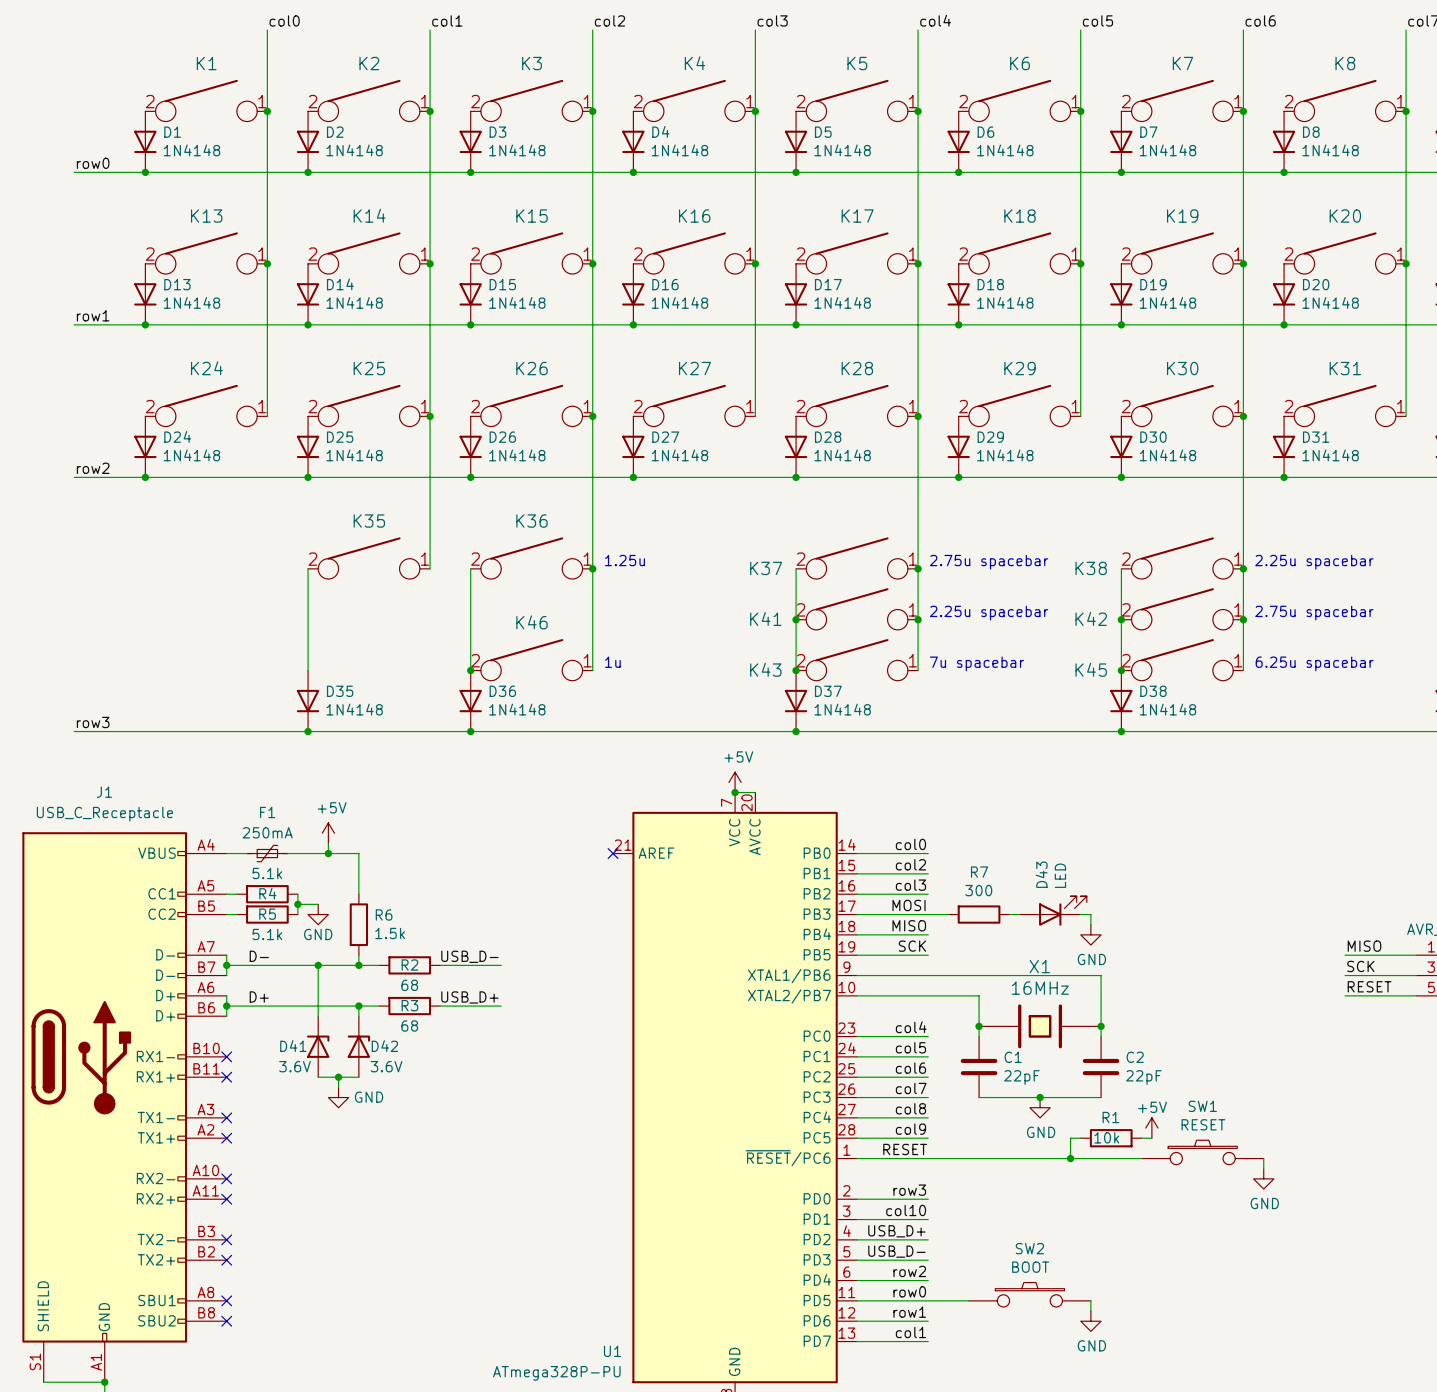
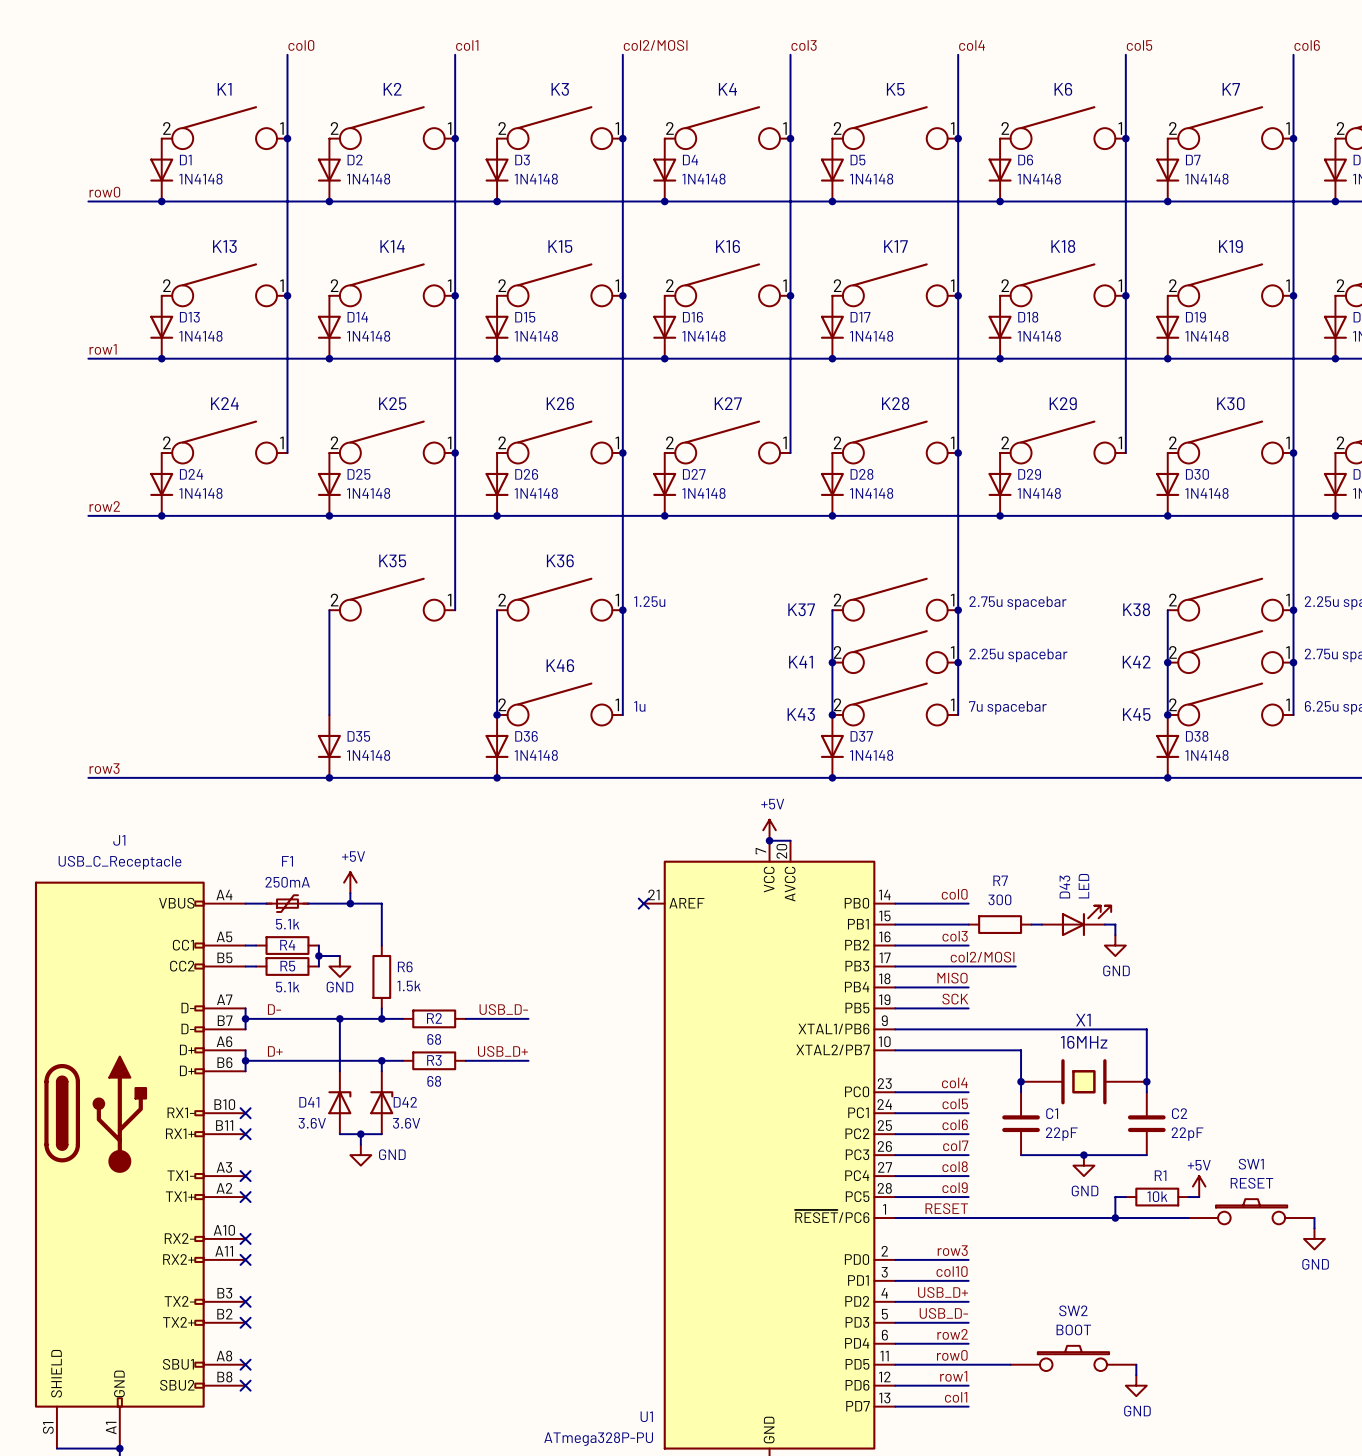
label: col2 (609, 20) -> col2/MOSI (655, 45)
label: col2 (910, 864) -> none
label: MOSI (909, 905) -> col2/MOSI (982, 957)
D43 position: (1053, 910) -> (1076, 920)
wire: none -> (989, 966) (1015, 966)
R7 position: (979, 914) -> (1000, 924)
wire: (1009, 914) (1019, 914) -> (1031, 924) (1042, 924)
wire: (1080, 914) (1090, 914) (1090, 924) -> (1104, 924) (1115, 924) (1115, 935)
power symbol position: GND (1090, 934) -> GND (1115, 945)

